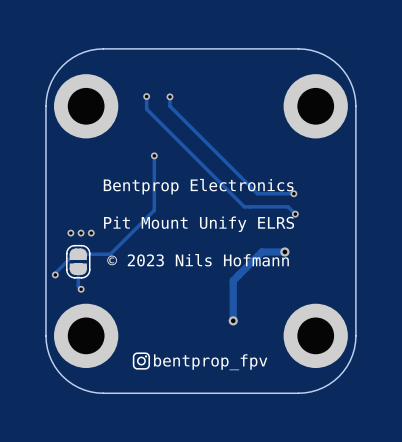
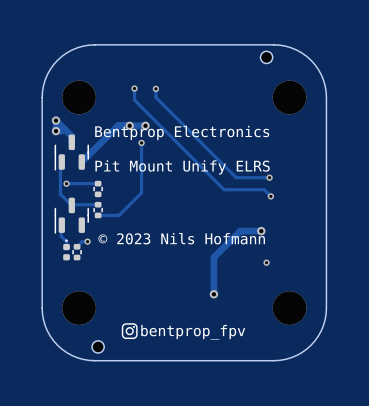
part: none -> (266, 57)
part footprint: [54, 74, 119, 139] -> [62, 80, 96, 115]
part footprint: [283, 74, 348, 139] -> [272, 80, 307, 115]
via: none -> (56, 120)
via: none -> (129, 125)
track: none -> (145, 125) (117, 125) (81, 162)
via: none -> (145, 125)
track: none -> (63, 128) (61, 131) (56, 131) (56, 120) (71, 136) (71, 142)
via: none -> (56, 131)
part: none -> (71, 152)
track: none -> (61, 162) (60, 194) (71, 205)
text position: Bentprop Electronics (198, 186) -> Bentprop Electronics (182, 132)
via: none -> (66, 183)
track: none -> (98, 183) (66, 183)
part: none -> (98, 189)
track: none -> (98, 204) (71, 205)
text position: Pit Mount Unify ELRS (199, 224) -> Pit Mount Unify ELRS (182, 167)
part: none -> (98, 210)
via: (70, 233) -> none
via: (81, 233) -> none
via: (91, 233) -> none
track: (129, 234) (110, 254) (74, 254) (55, 274) -> (119, 215) (98, 215)
part: none -> (71, 215)
track: none -> (61, 225) (61, 236) (66, 241) (66, 247)
part: (78, 261) -> none
track: none -> (87, 241) (82, 241) (77, 246)
via: none -> (87, 241)
track: (78, 269) (78, 286) (81, 289) -> none
part: none -> (66, 250)
via: (55, 274) -> none
part: none -> (77, 252)
via: none -> (266, 262)
via: (81, 289) -> none
part footprint: [54, 303, 119, 369] -> [62, 291, 96, 325]
part footprint: [283, 303, 348, 369] -> [272, 291, 307, 325]
part: none -> (98, 346)

